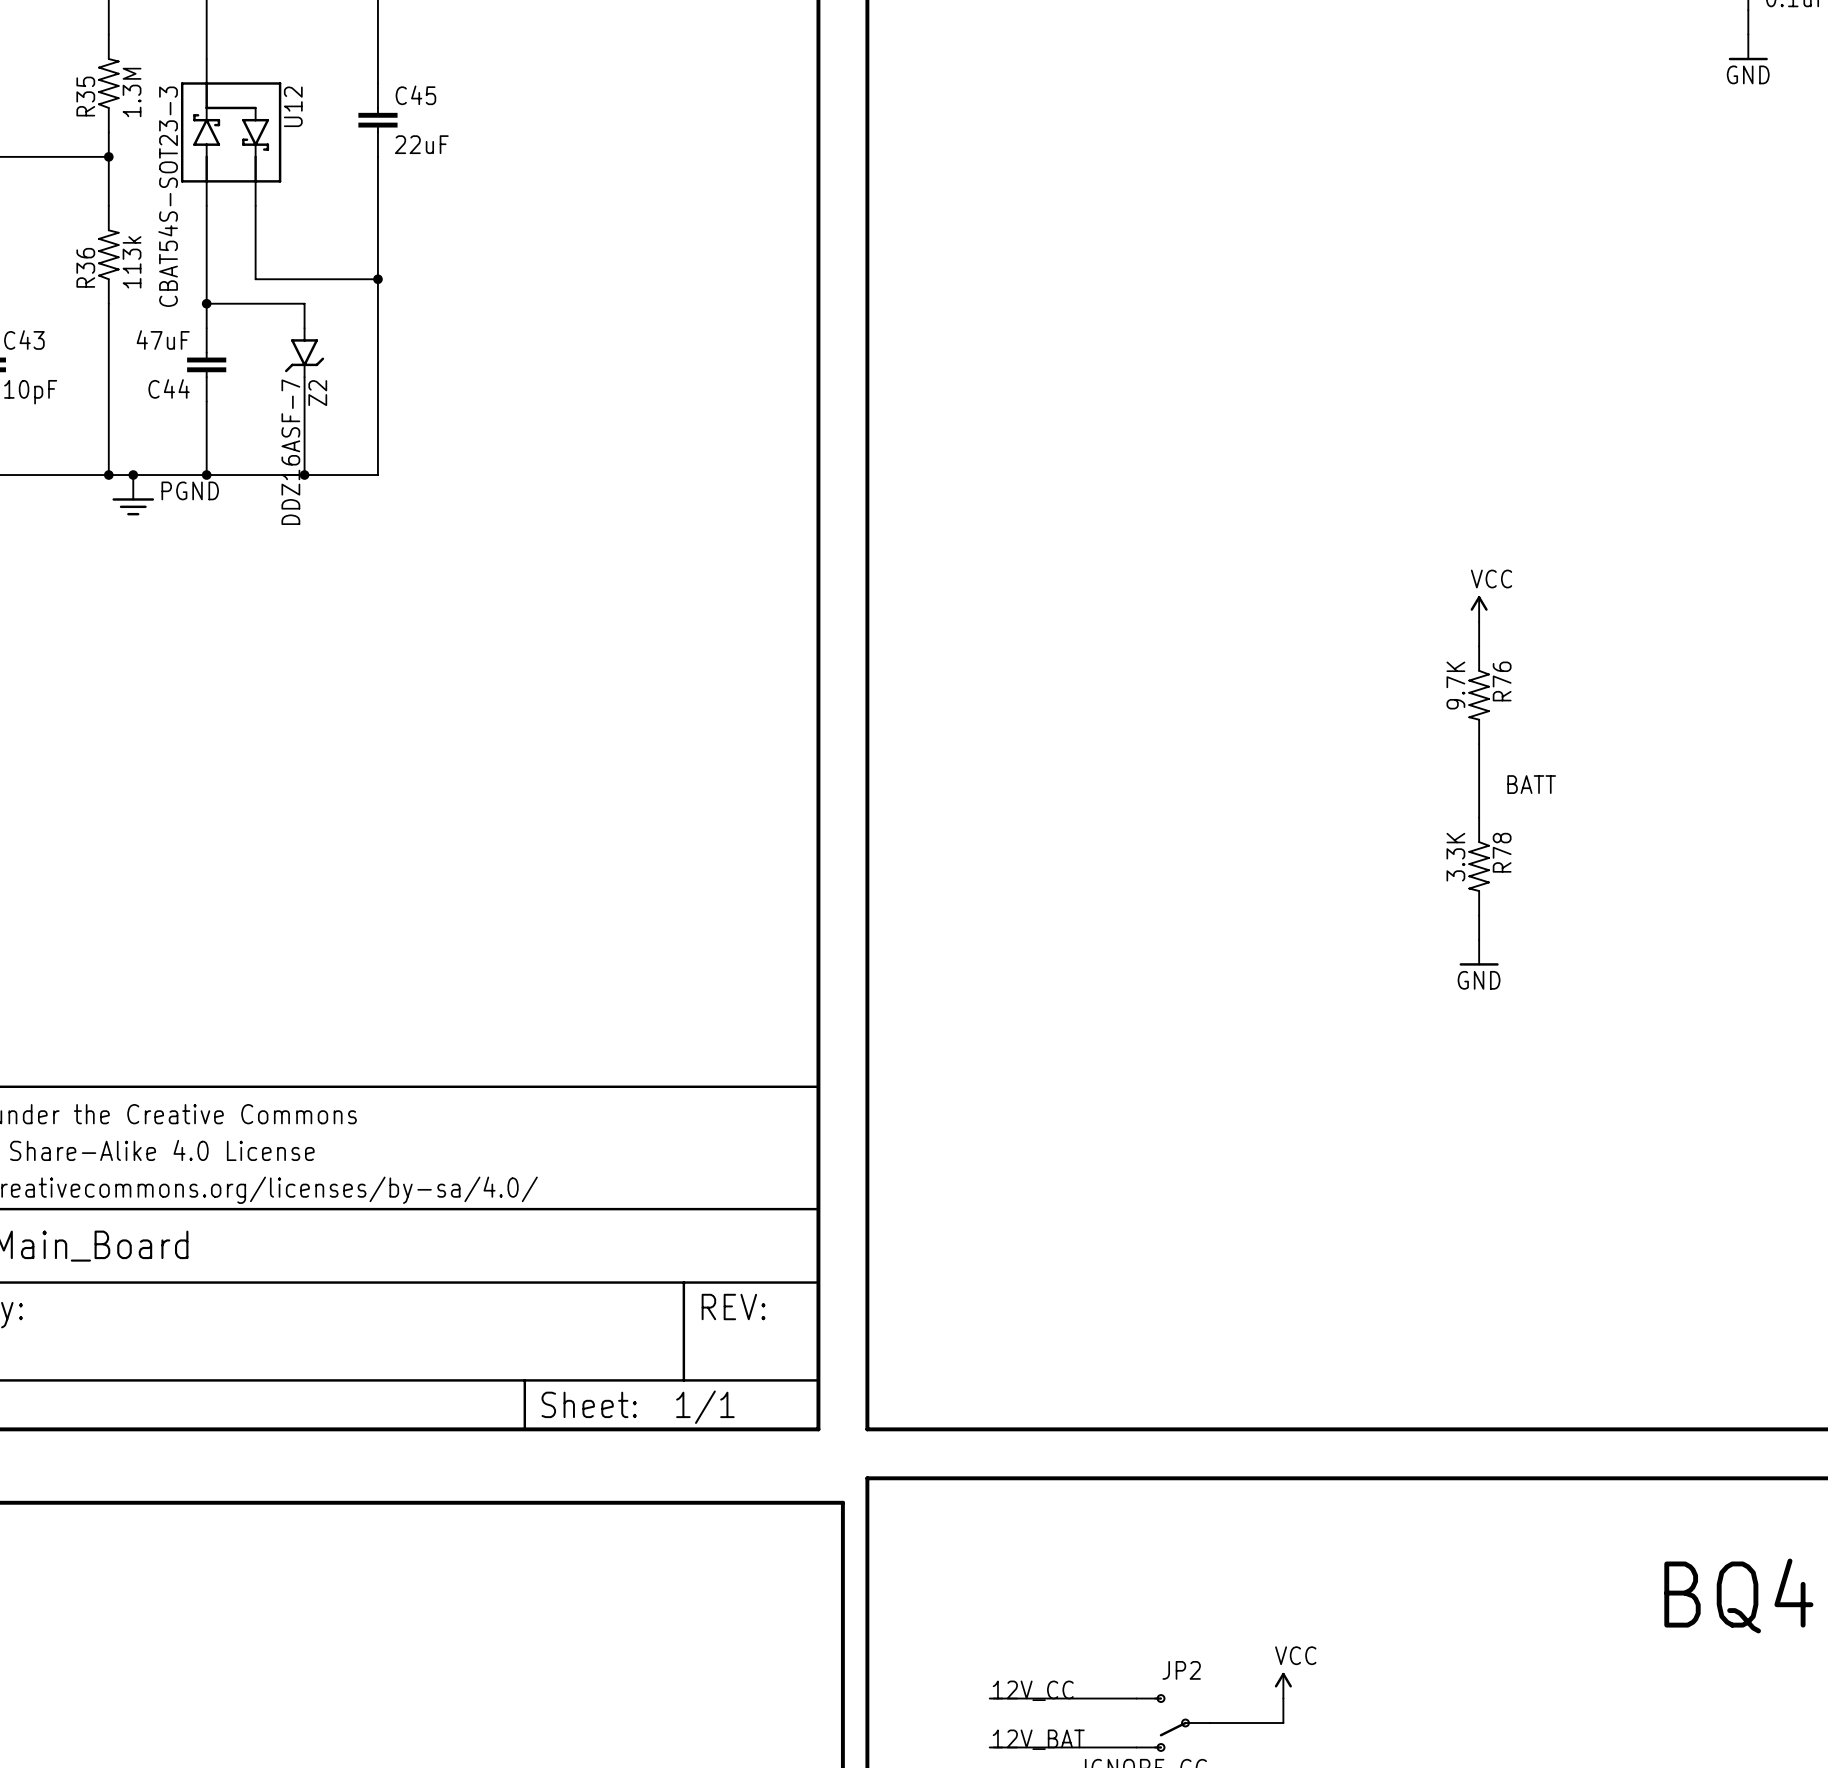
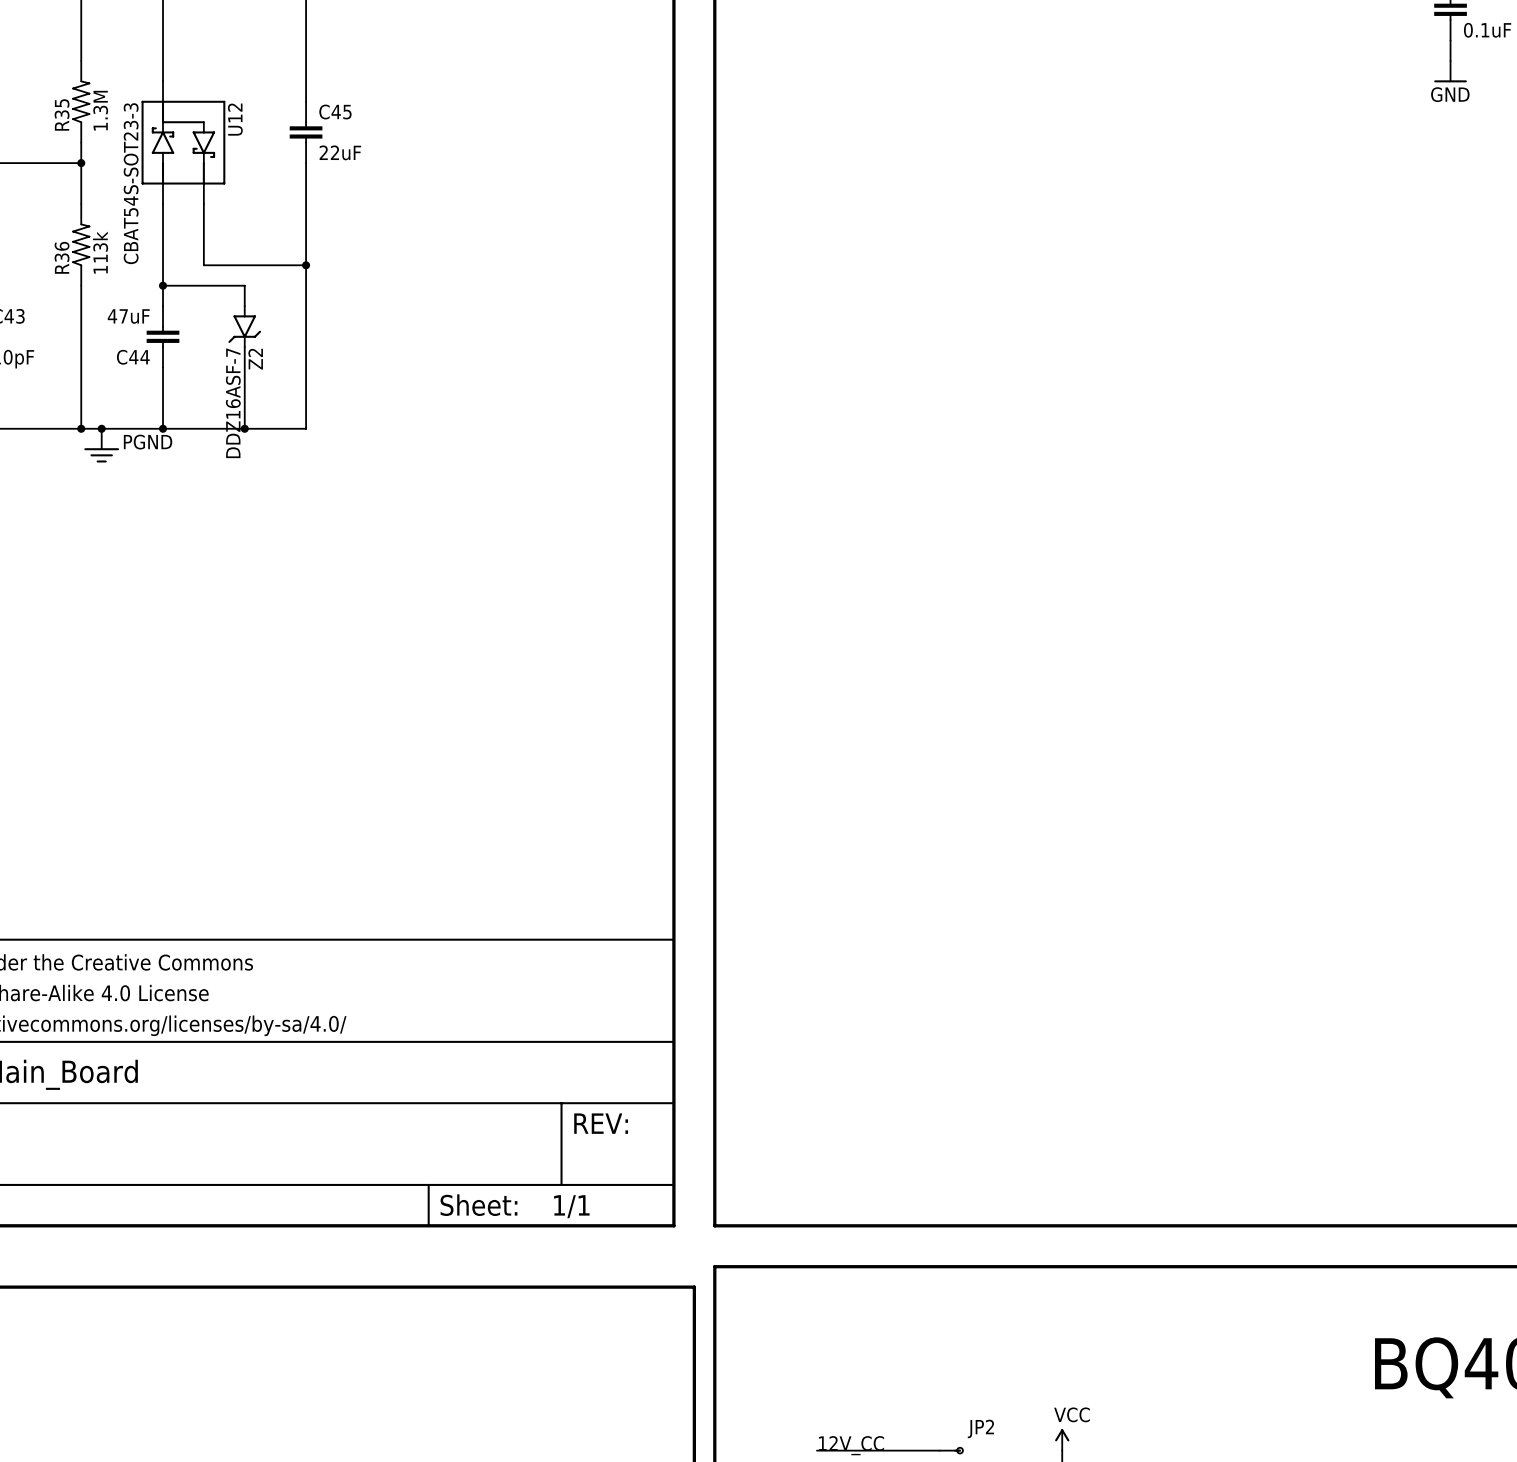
power symbol: VCC (1479, 608) -> none
wire: (1479, 621) (1479, 646) -> none
R76: 9.7K (1479, 695) -> none
wire: (1479, 744) (1479, 817) -> none
label: BATT (1531, 784) -> none
R78: 3.3K (1479, 866) -> none
wire: (1479, 915) (1479, 939) -> none
power symbol: GND (1479, 952) -> none

